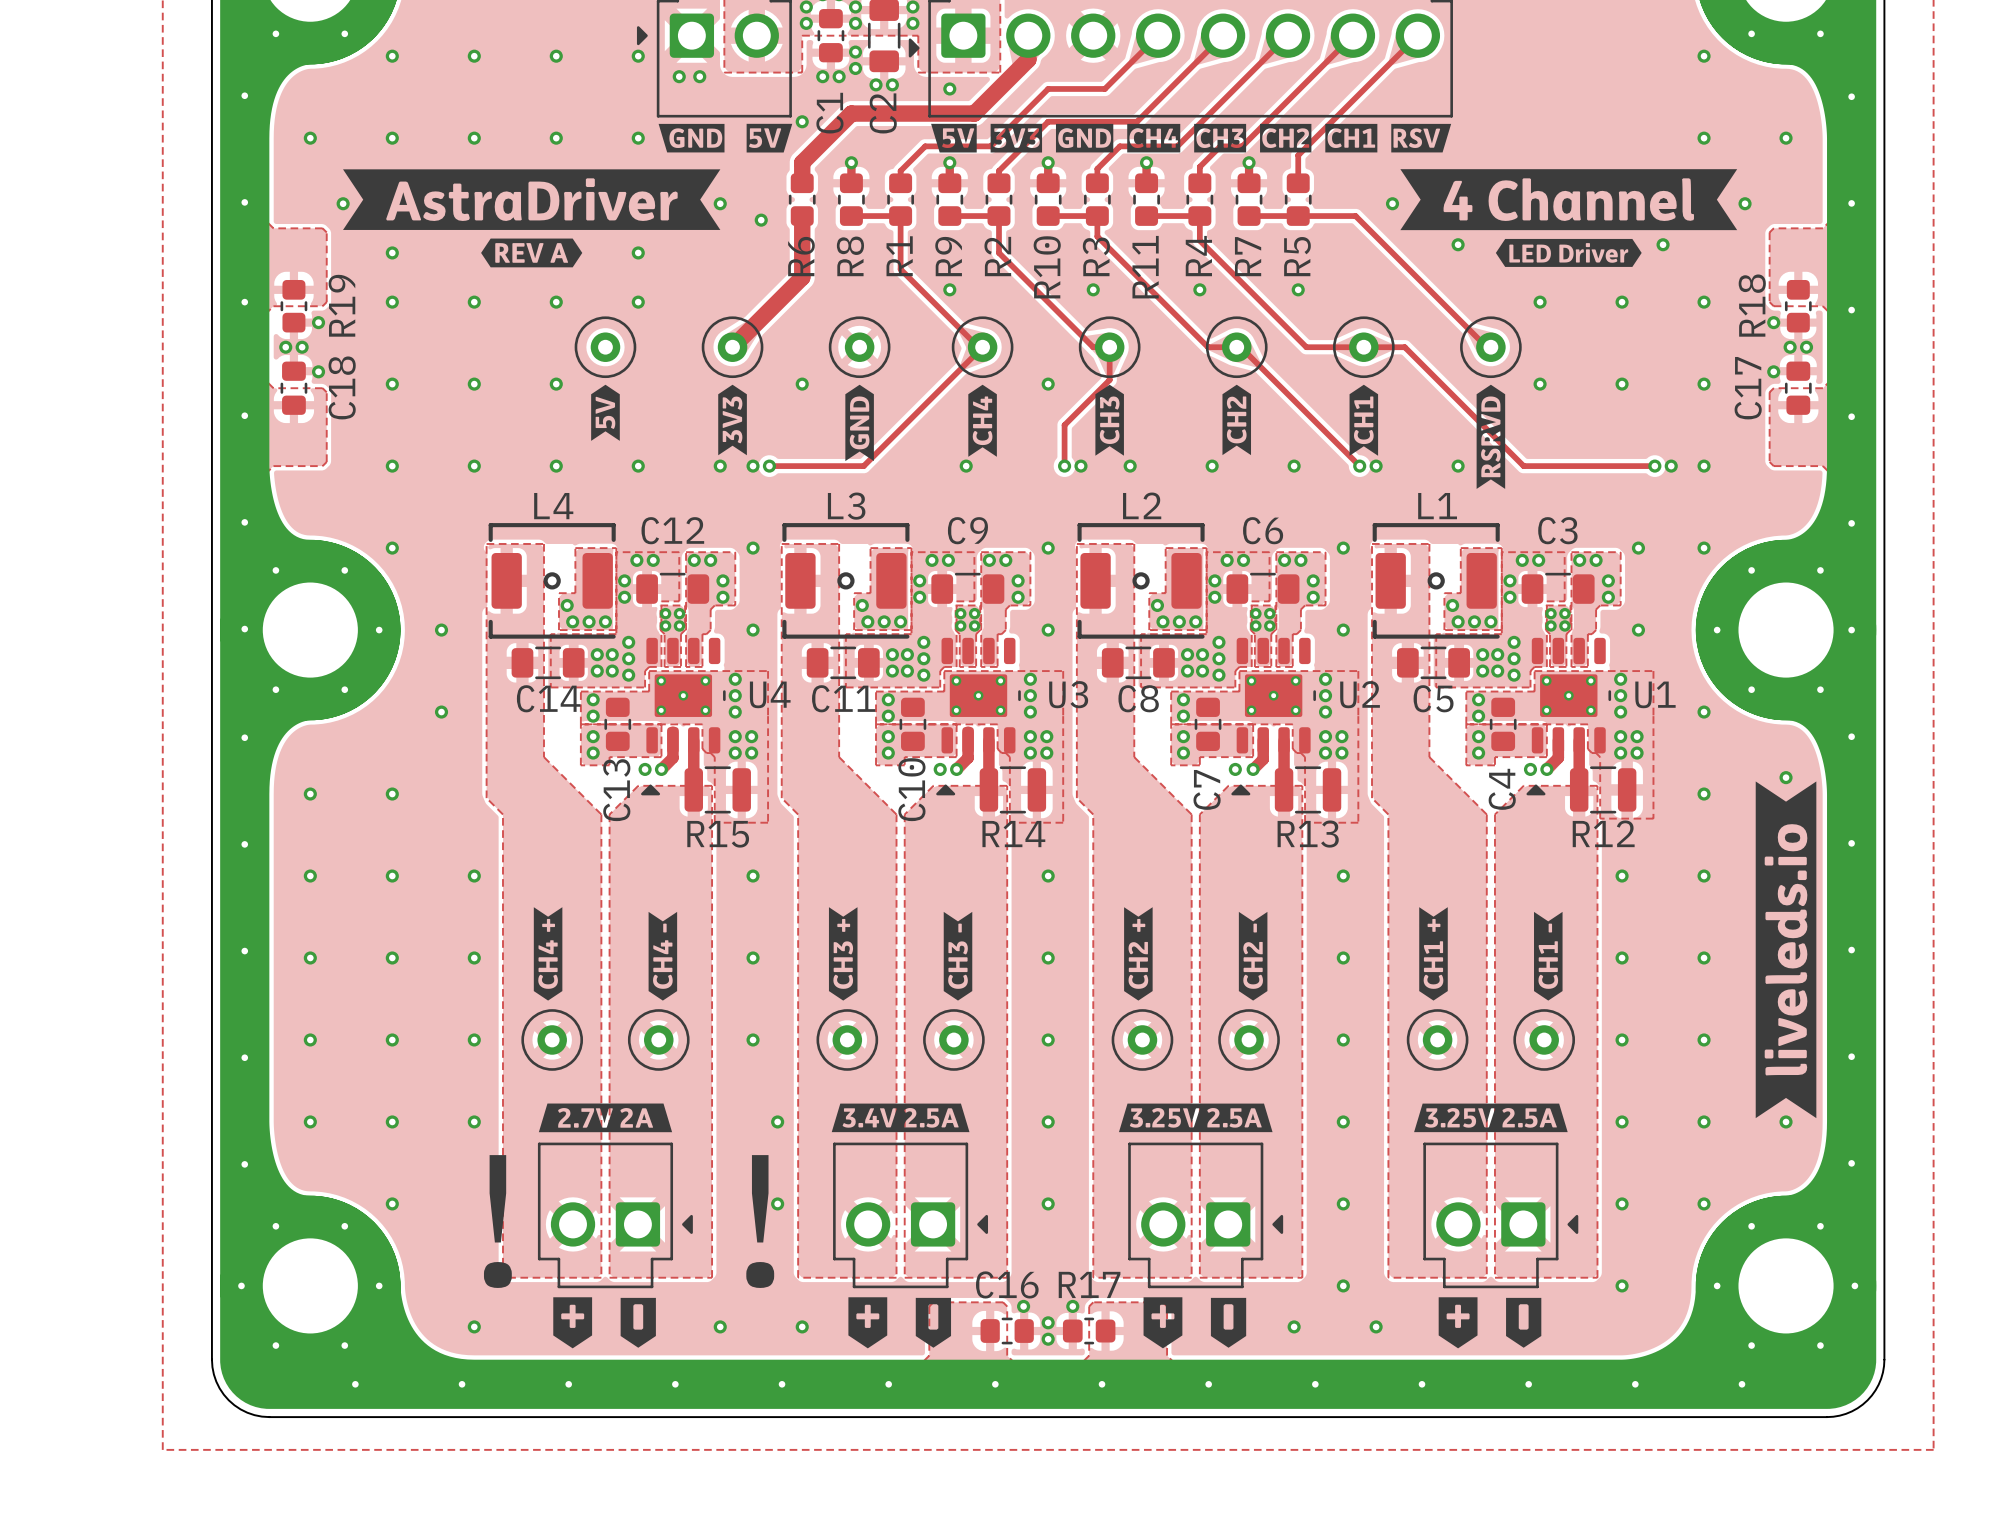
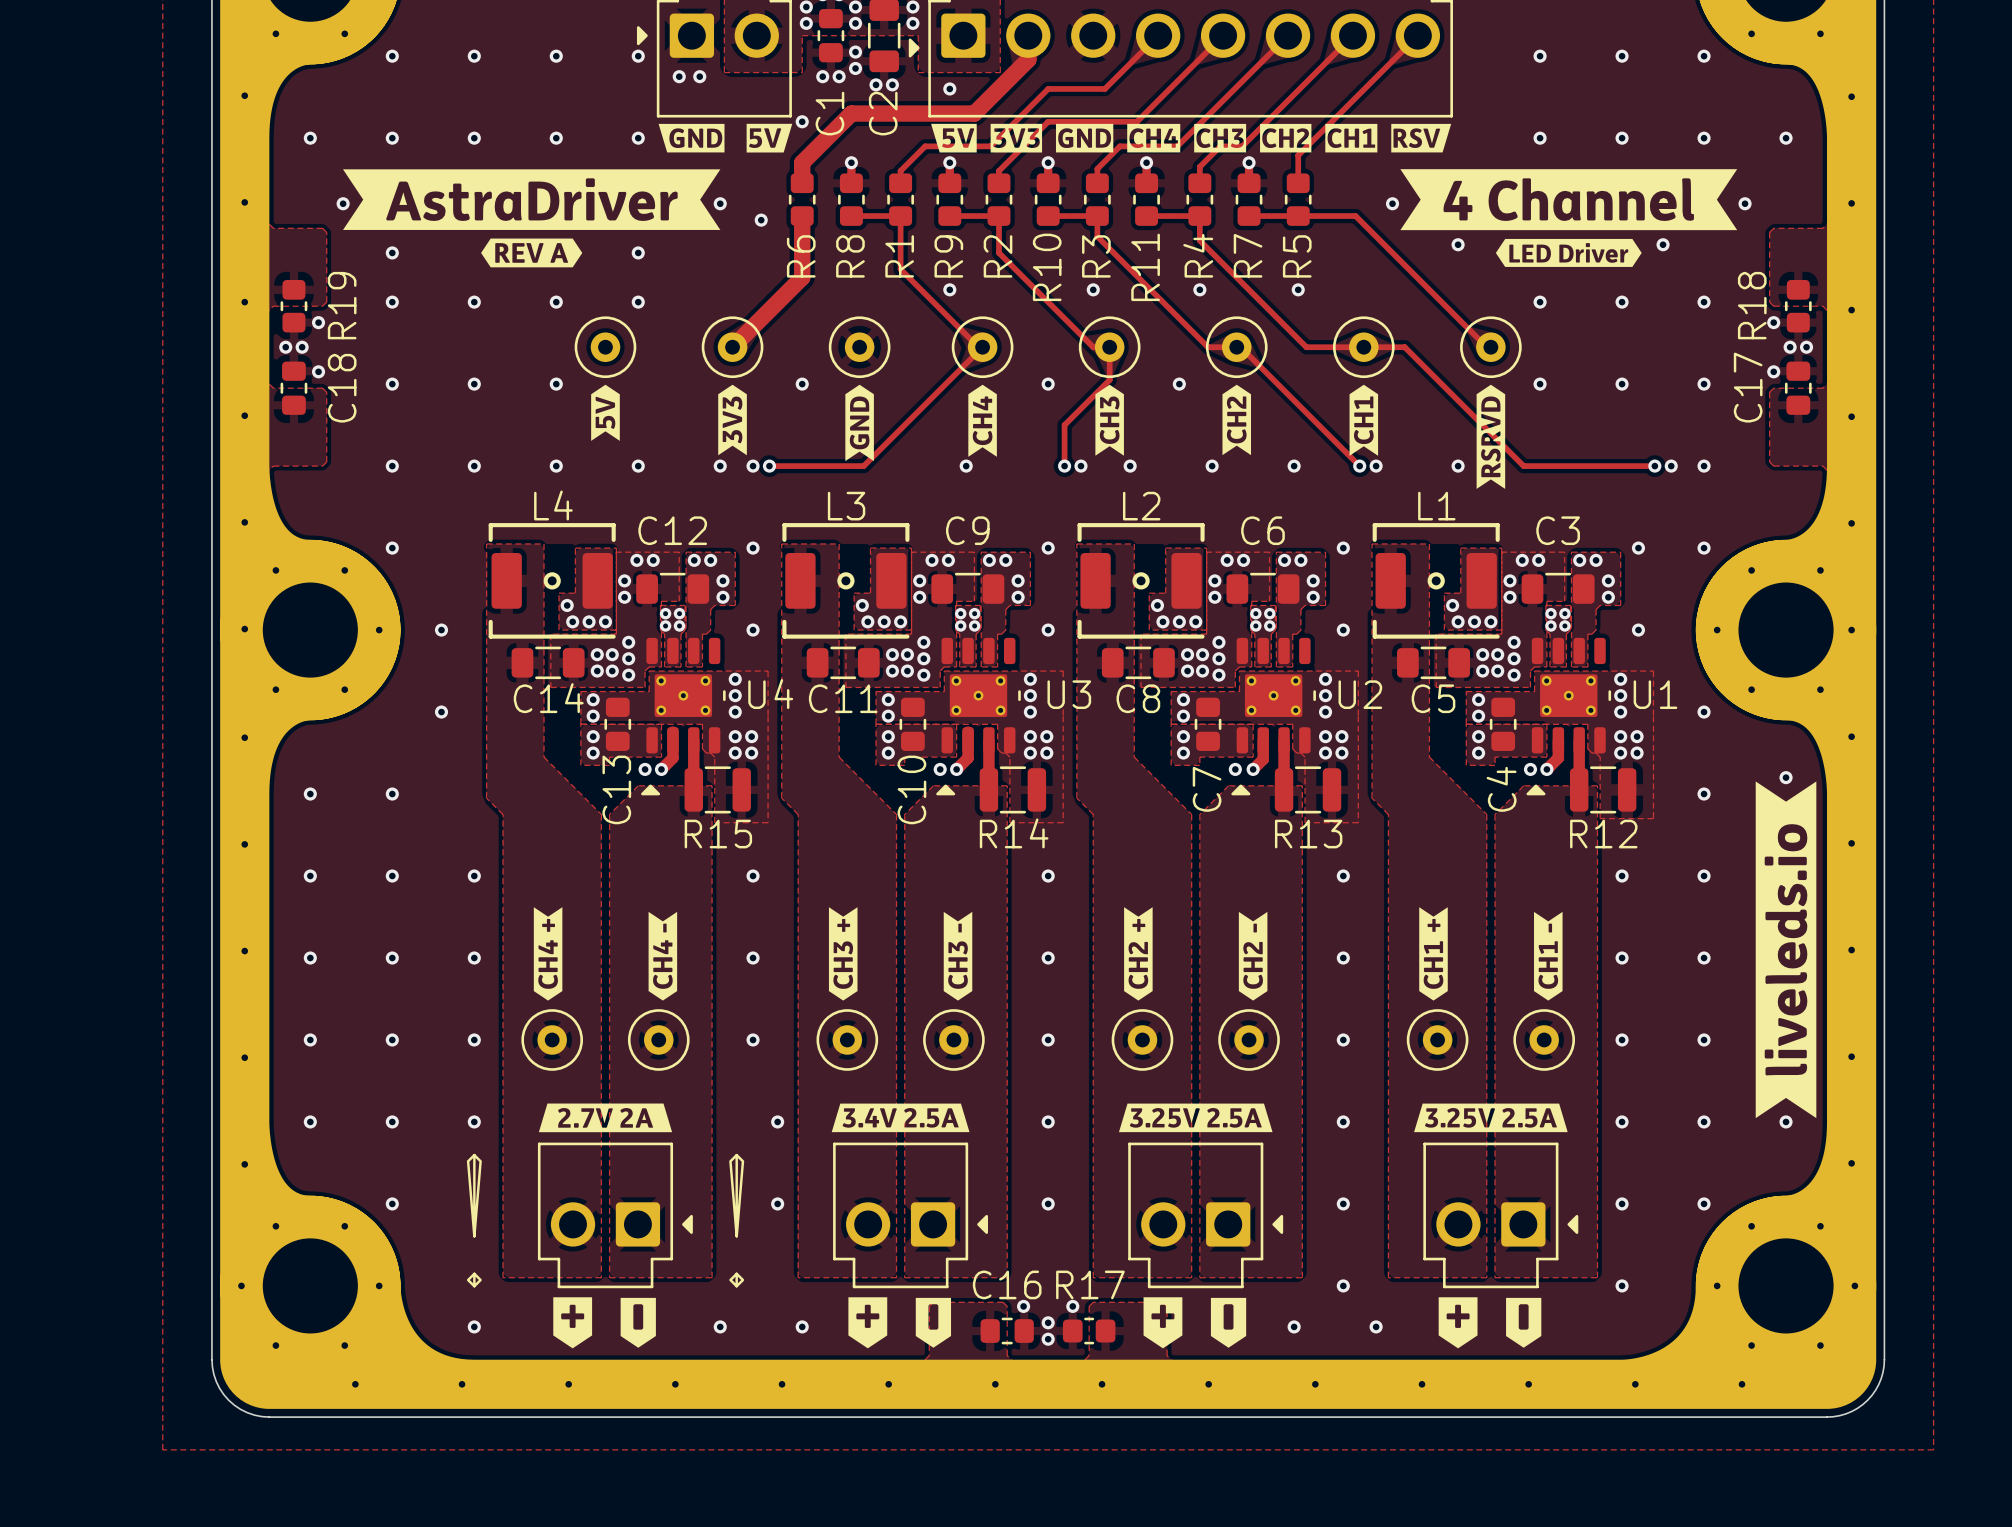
via: none -> (1540, 56)
via: none -> (1622, 56)
via: none -> (1540, 138)
via: none -> (1622, 138)
via: none -> (1179, 384)

